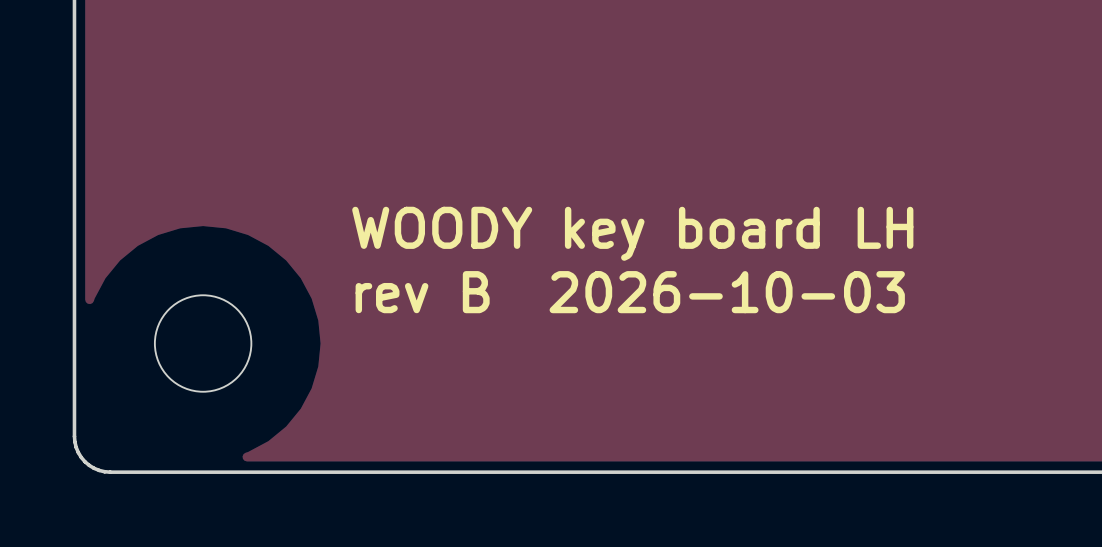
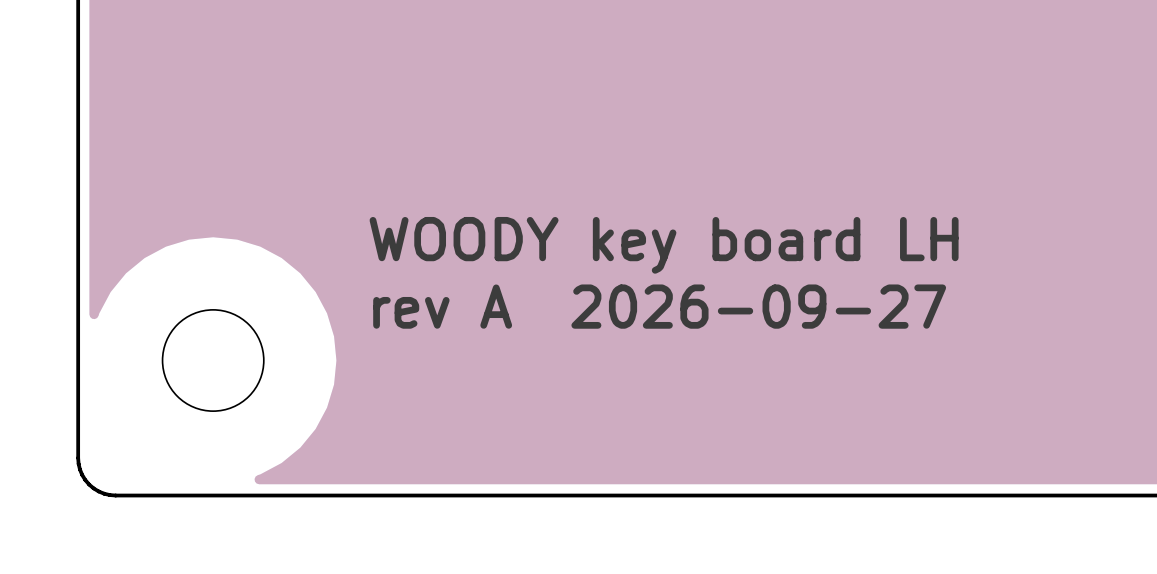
text: rev B 2026-10-03 (630, 292) -> rev A 2026-09-27 (659, 306)

